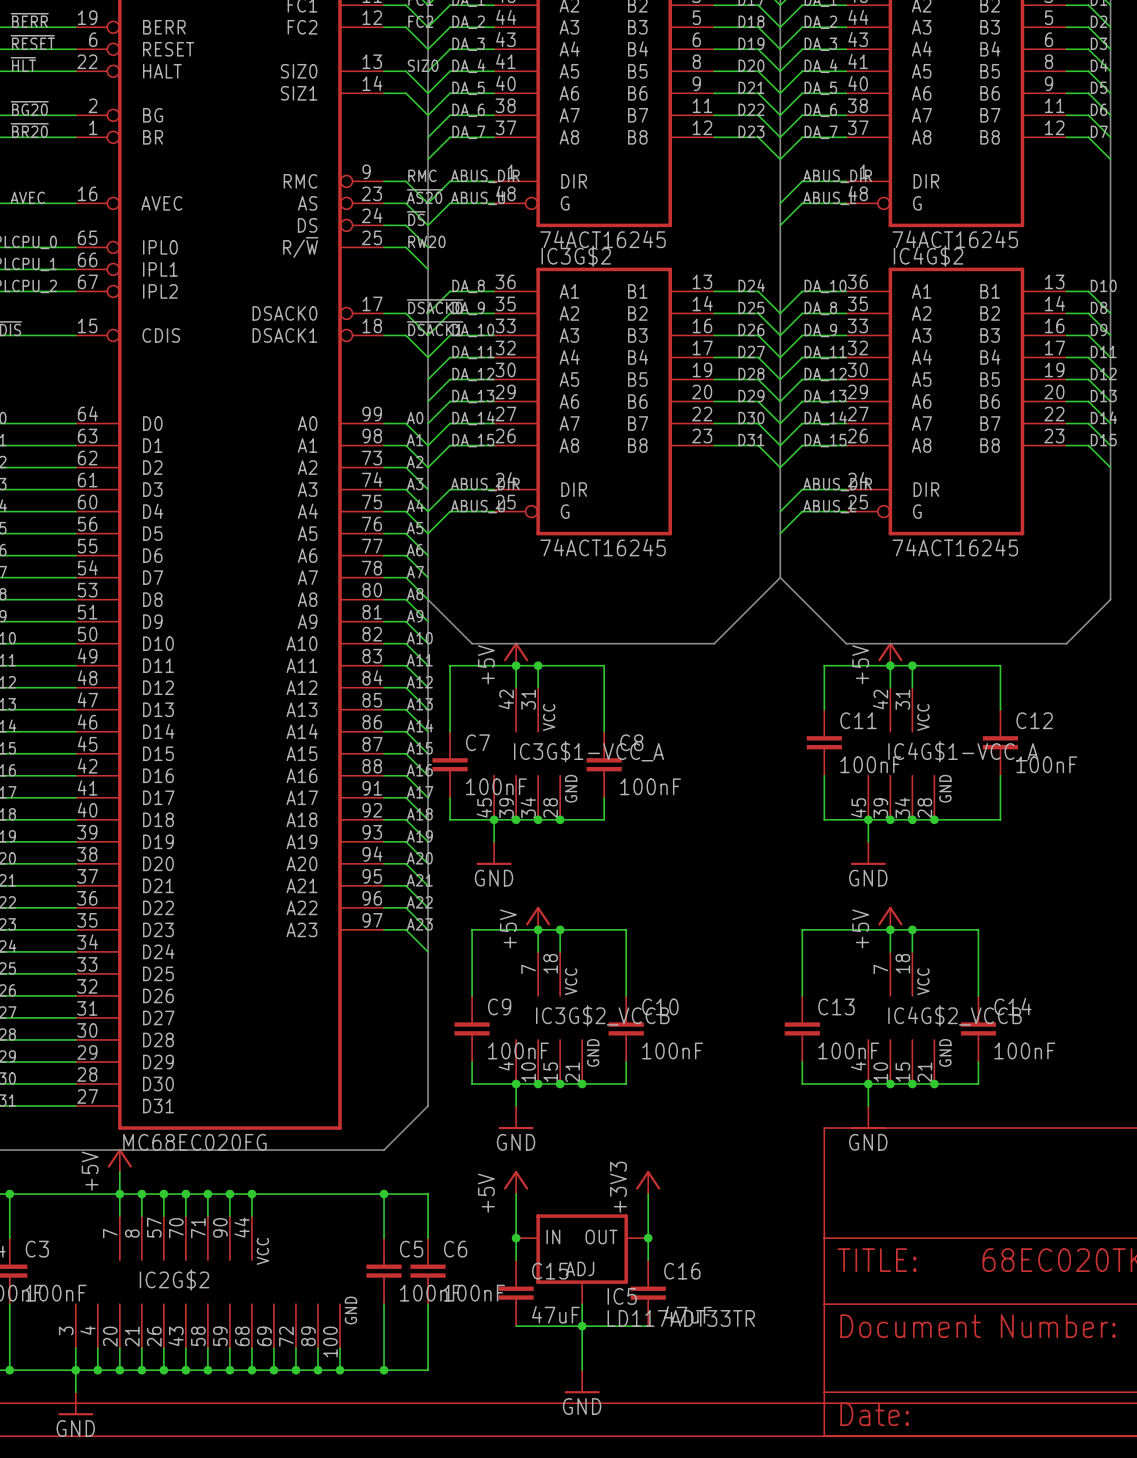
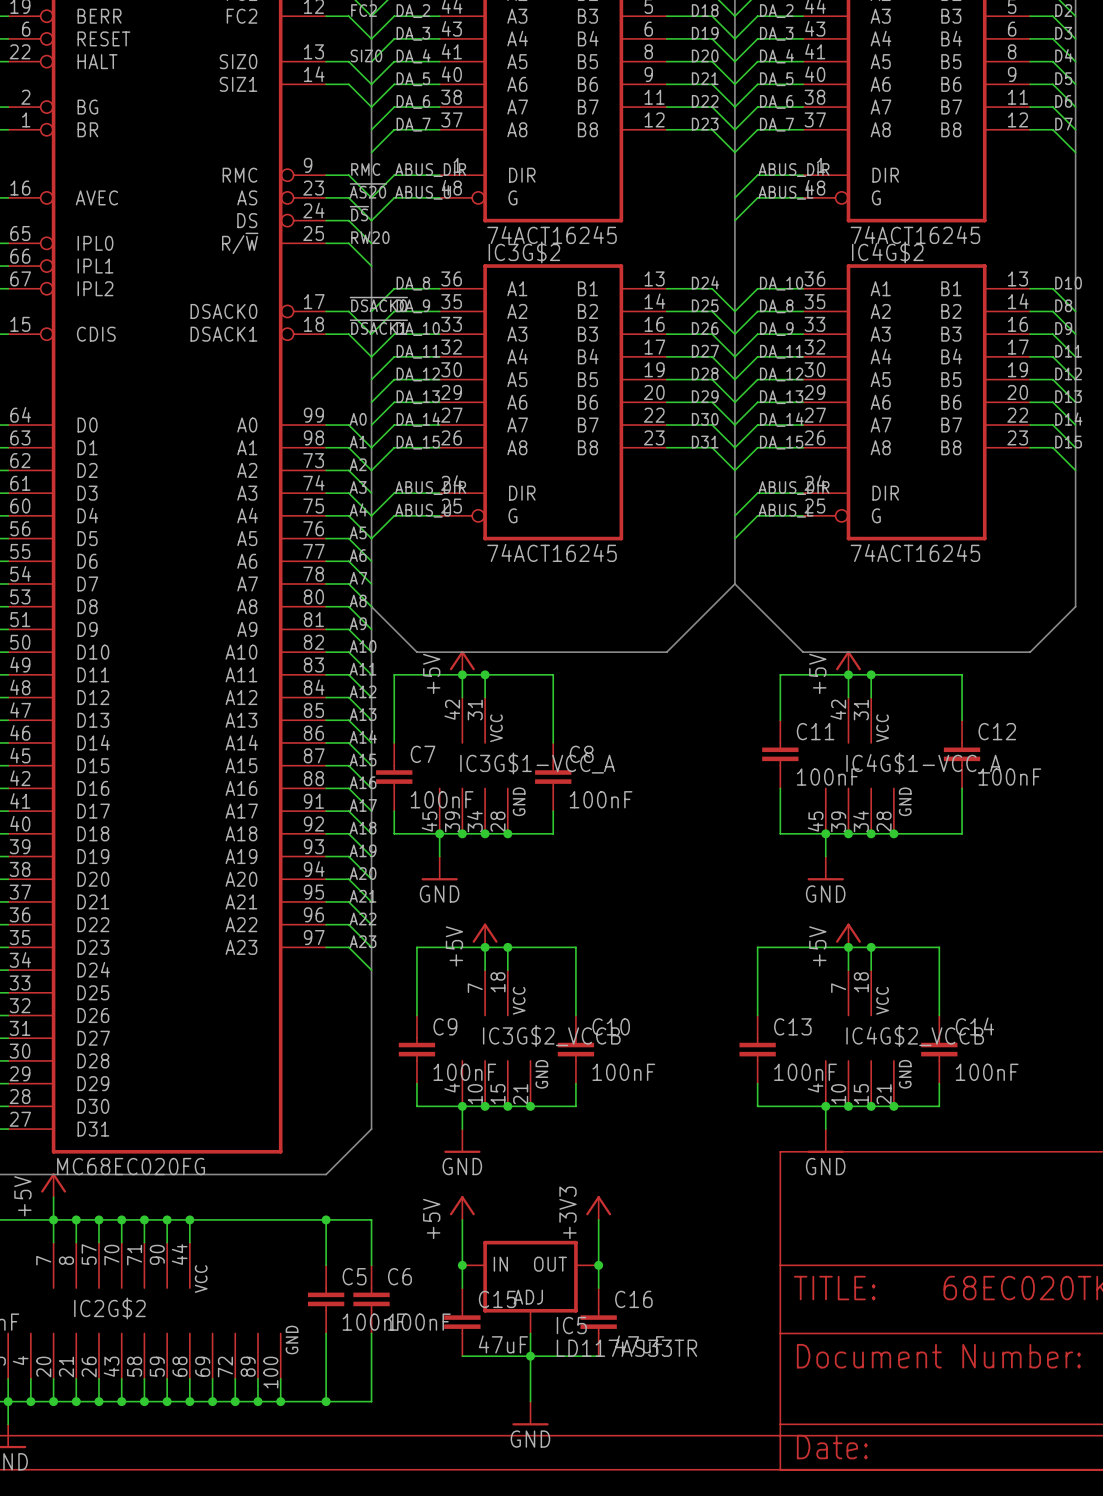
IC5 value: LD117ADT33TR (681, 1318) -> LD117AS33TR (626, 1348)

